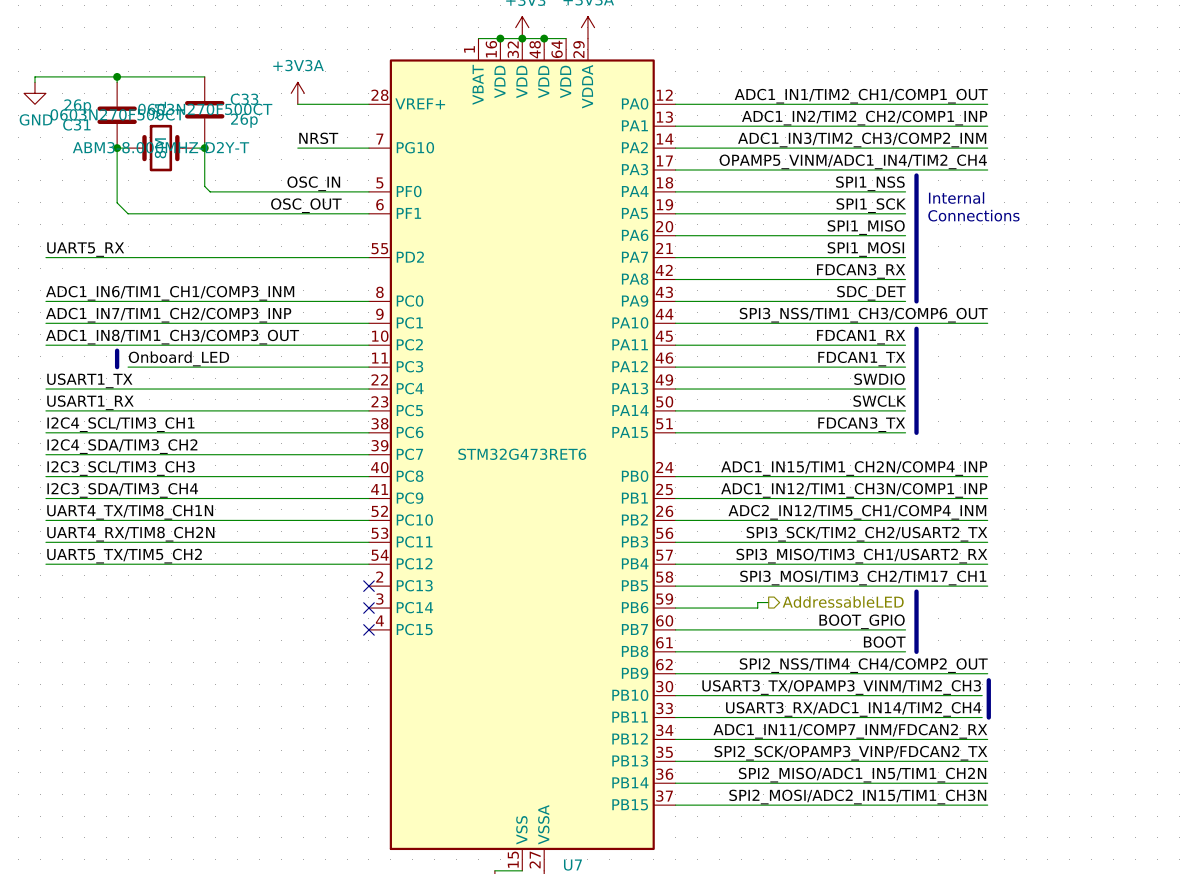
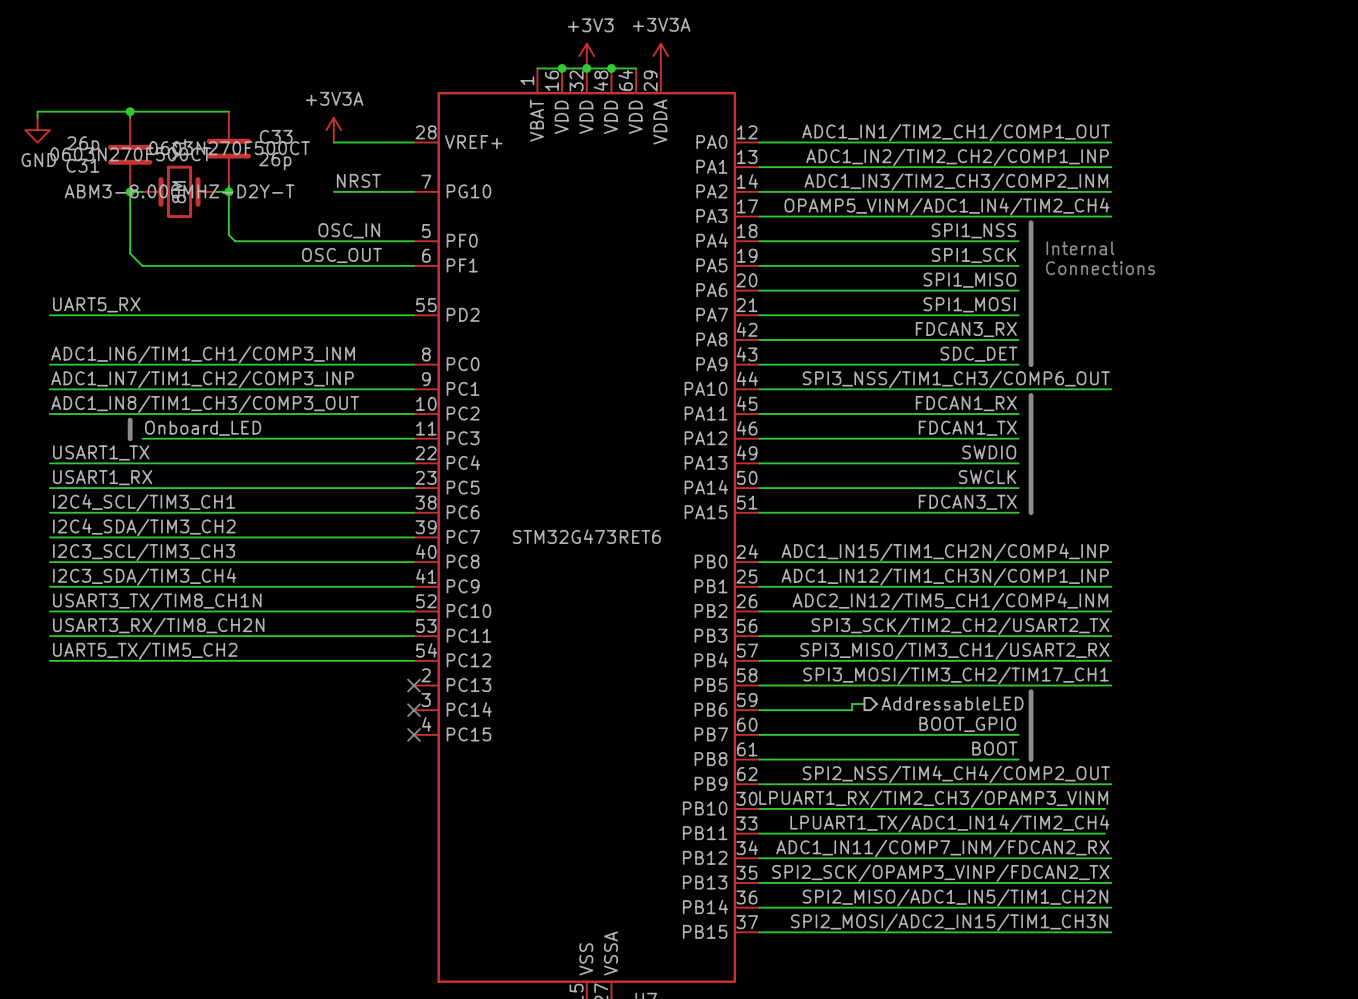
label: UART4_TX/TIM8_CH1N (130, 512) -> USART3_TX/TIM8_CH1N (157, 601)
label: UART4_RX/TIM8_CH2N (130, 534) -> USART3_RX/TIM8_CH2N (158, 626)
line: (988, 680) (988, 717) -> none
label: USART3_TX/OPAMP3_VINM/TIM2_CH3 (841, 687) -> LPUART1_RX/TIM2_CH3/OPAMP3_VINM (933, 799)
label: USART3_RX/ADC1_IN14/TIM2_CH4 (853, 709) -> LPUART1_TX/ADC1_IN14/TIM2_CH4 (949, 823)

